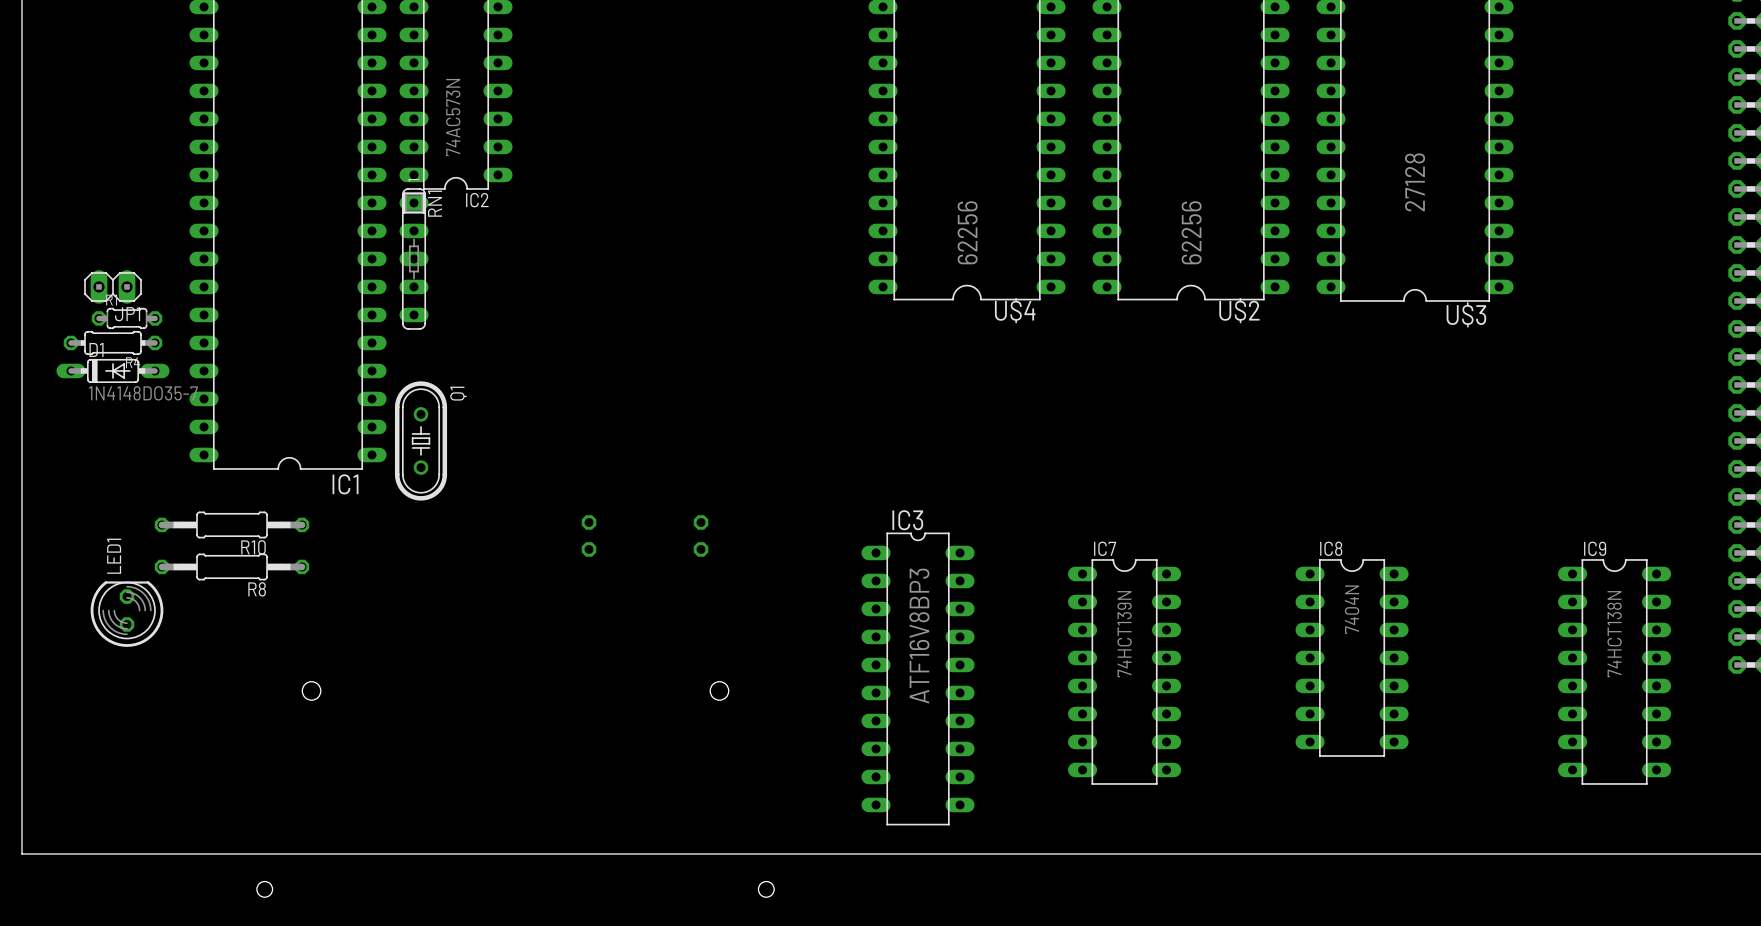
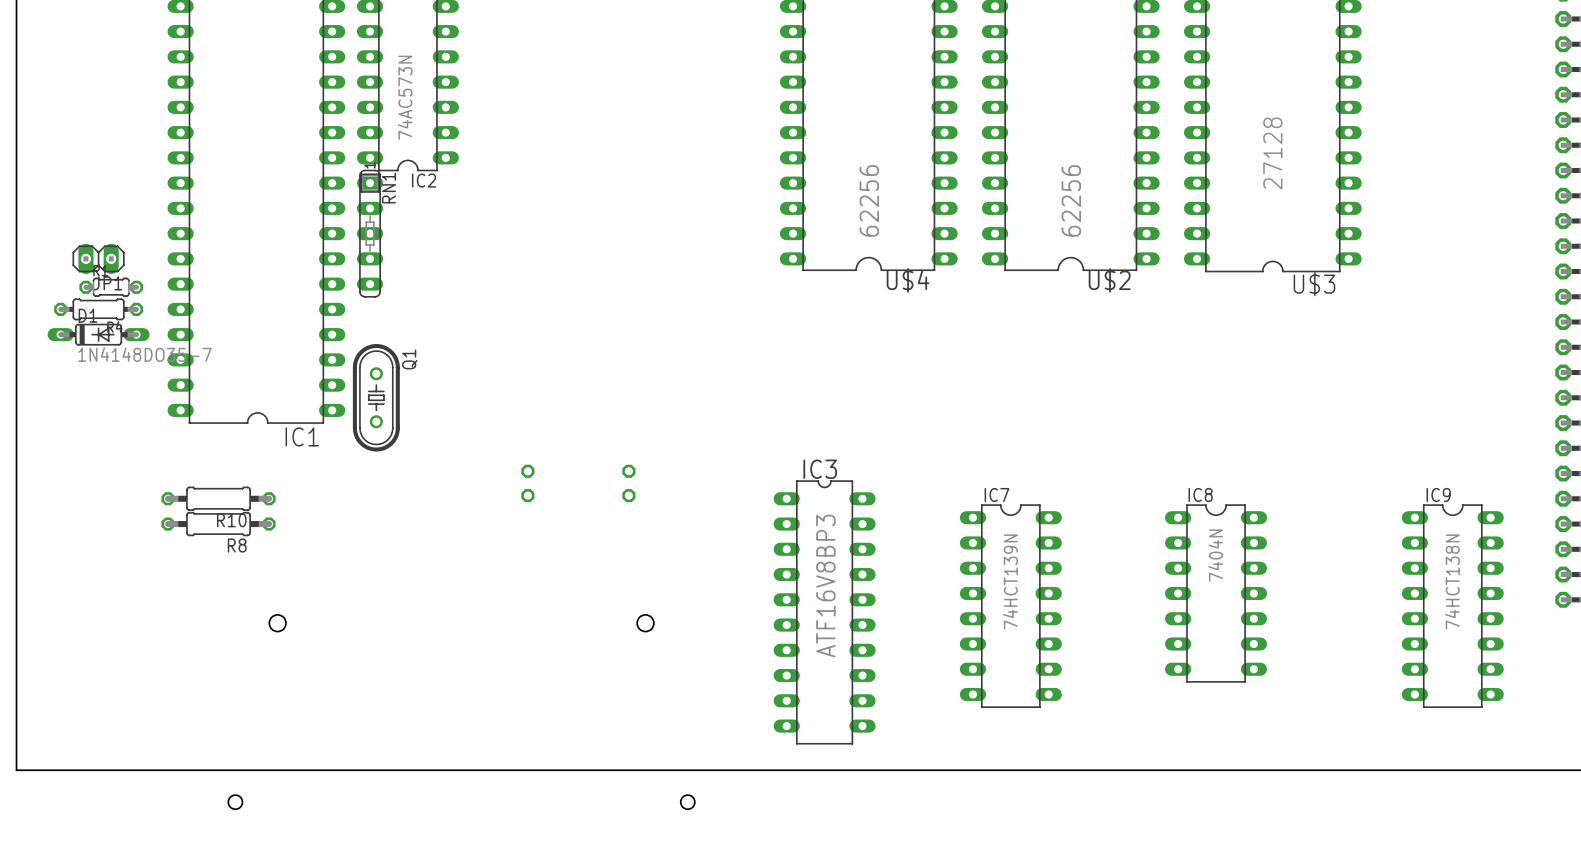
R10 footprint: [154, 511, 310, 539] -> [161, 486, 276, 511]
R8 footprint: [154, 553, 310, 581] -> [161, 511, 276, 537]
LED1: (127, 614) -> none

